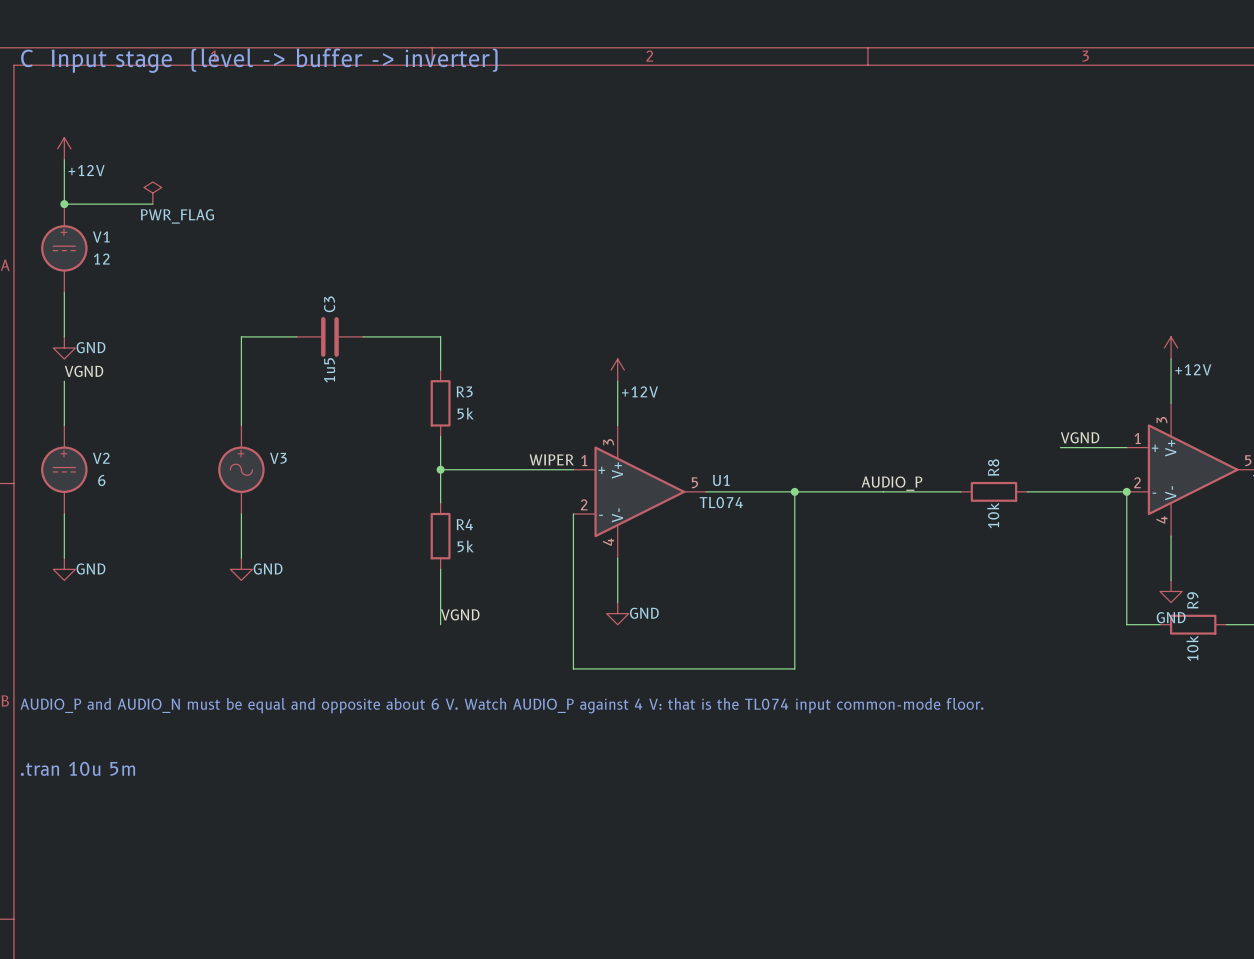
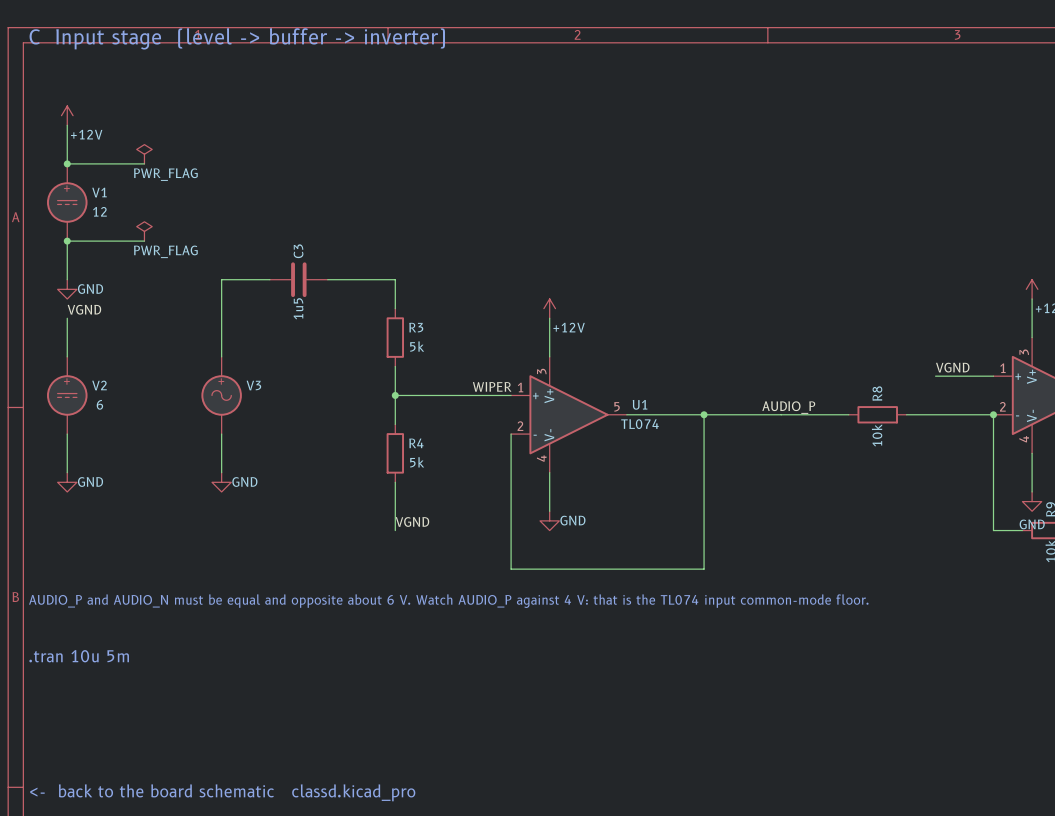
power symbol: none -> PWR_FLAG (144, 231)
wire: none -> (67, 241) (144, 241)
junction: none -> (67, 241)
text: none -> <- back to the board schematic classd.kicad_pro (222, 792)

